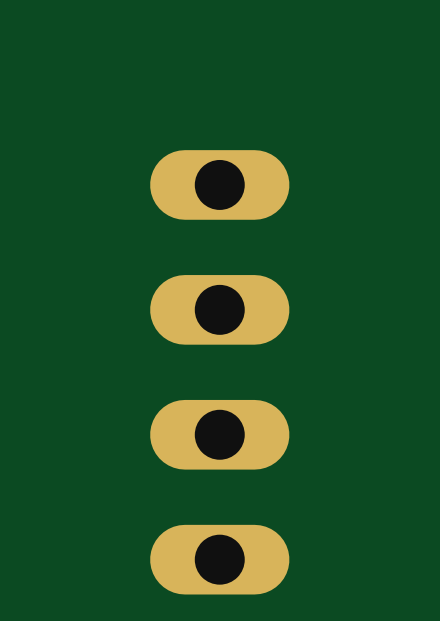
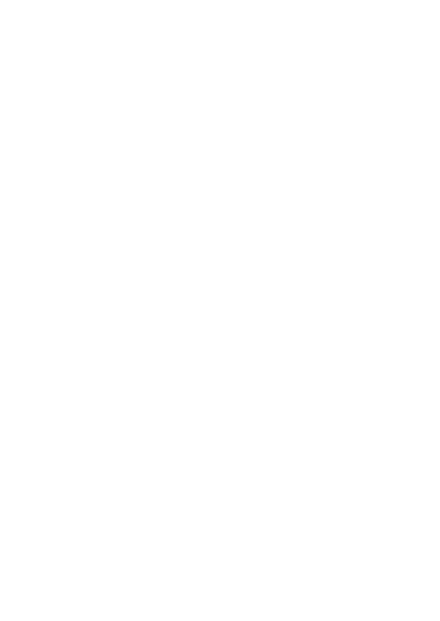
part: (219, 372) -> none

